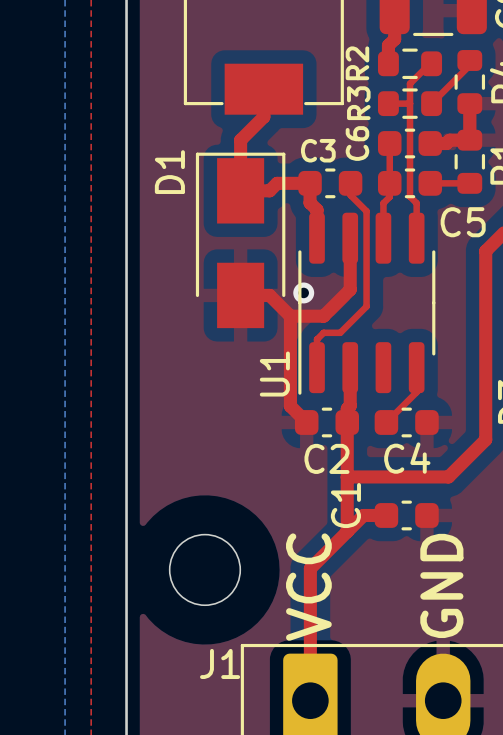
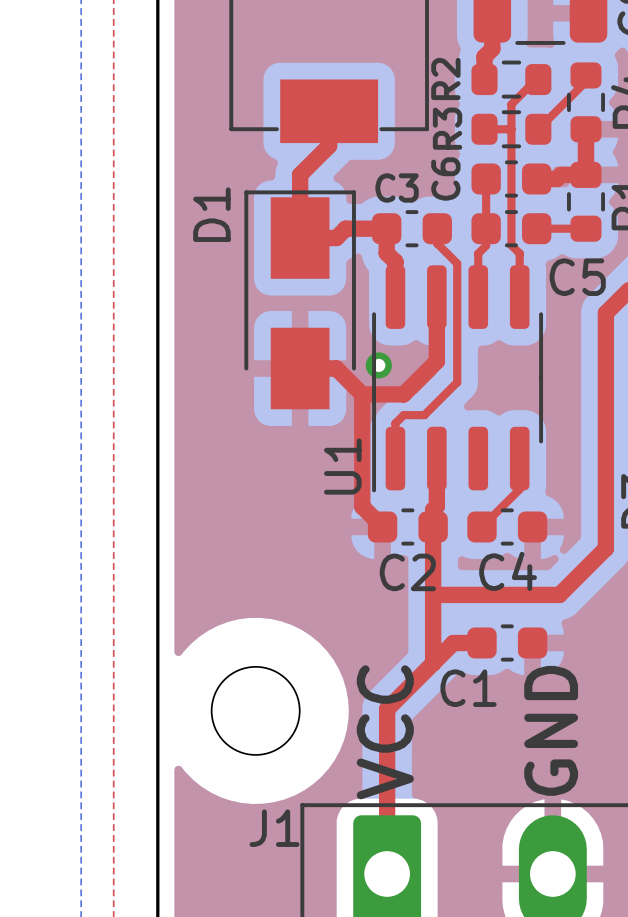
C1 name rotation: 0° (345, 505) -> 90° clockwise (468, 688)

